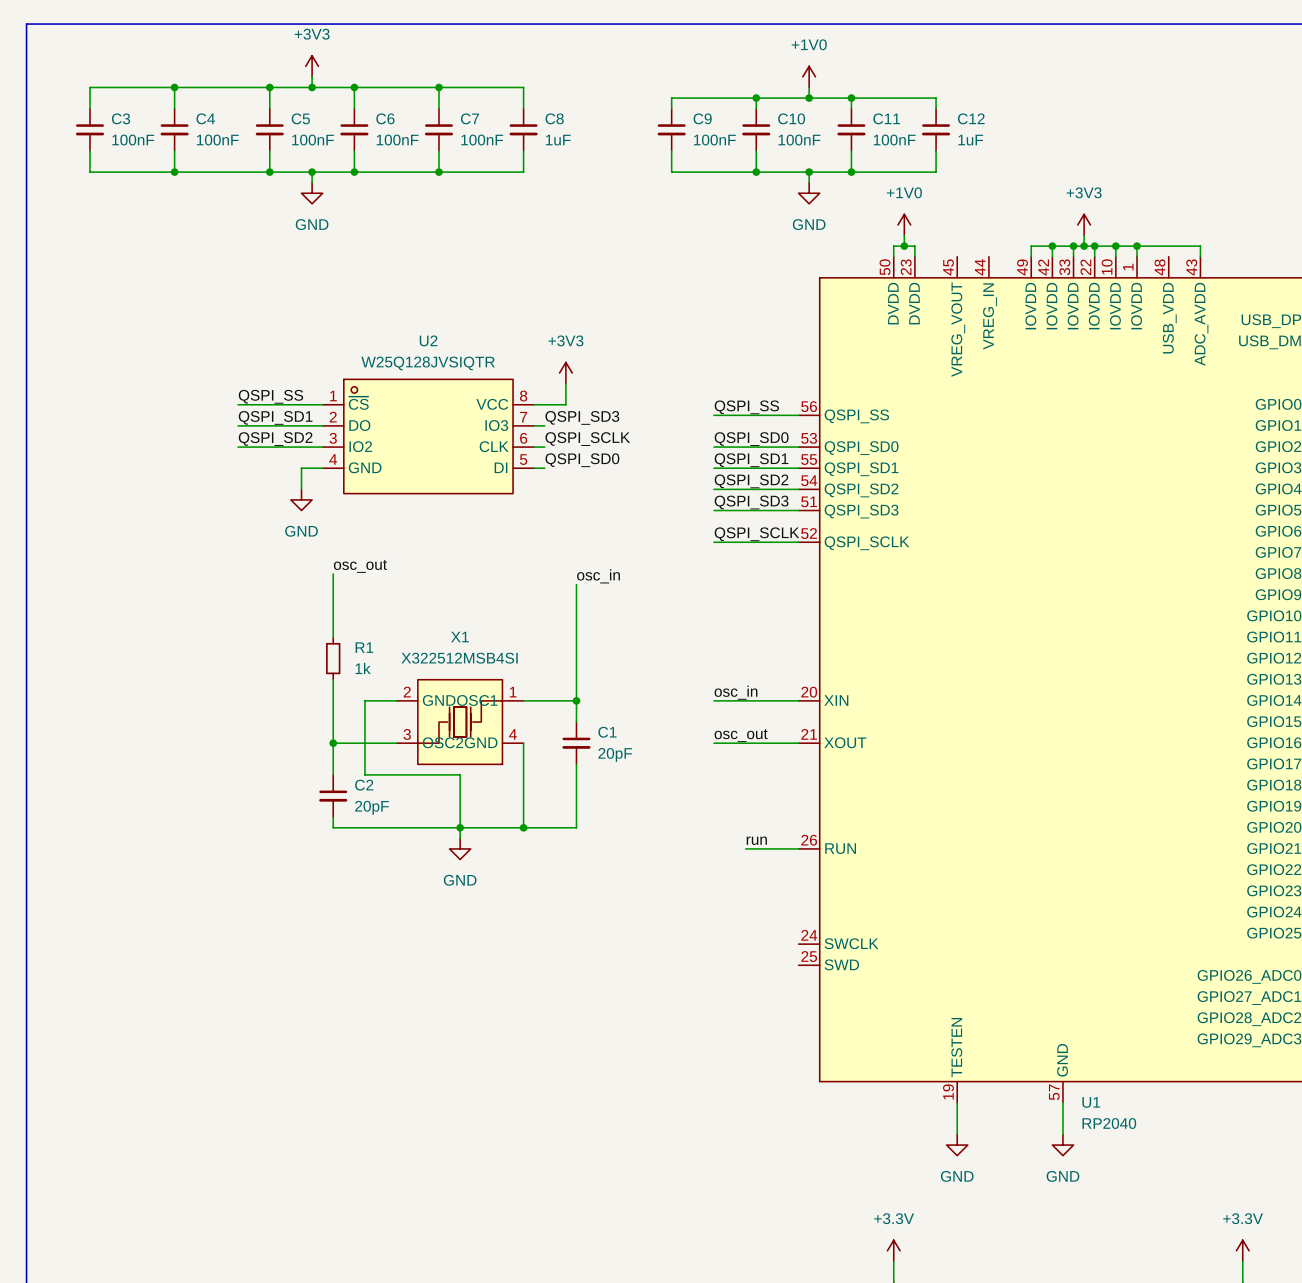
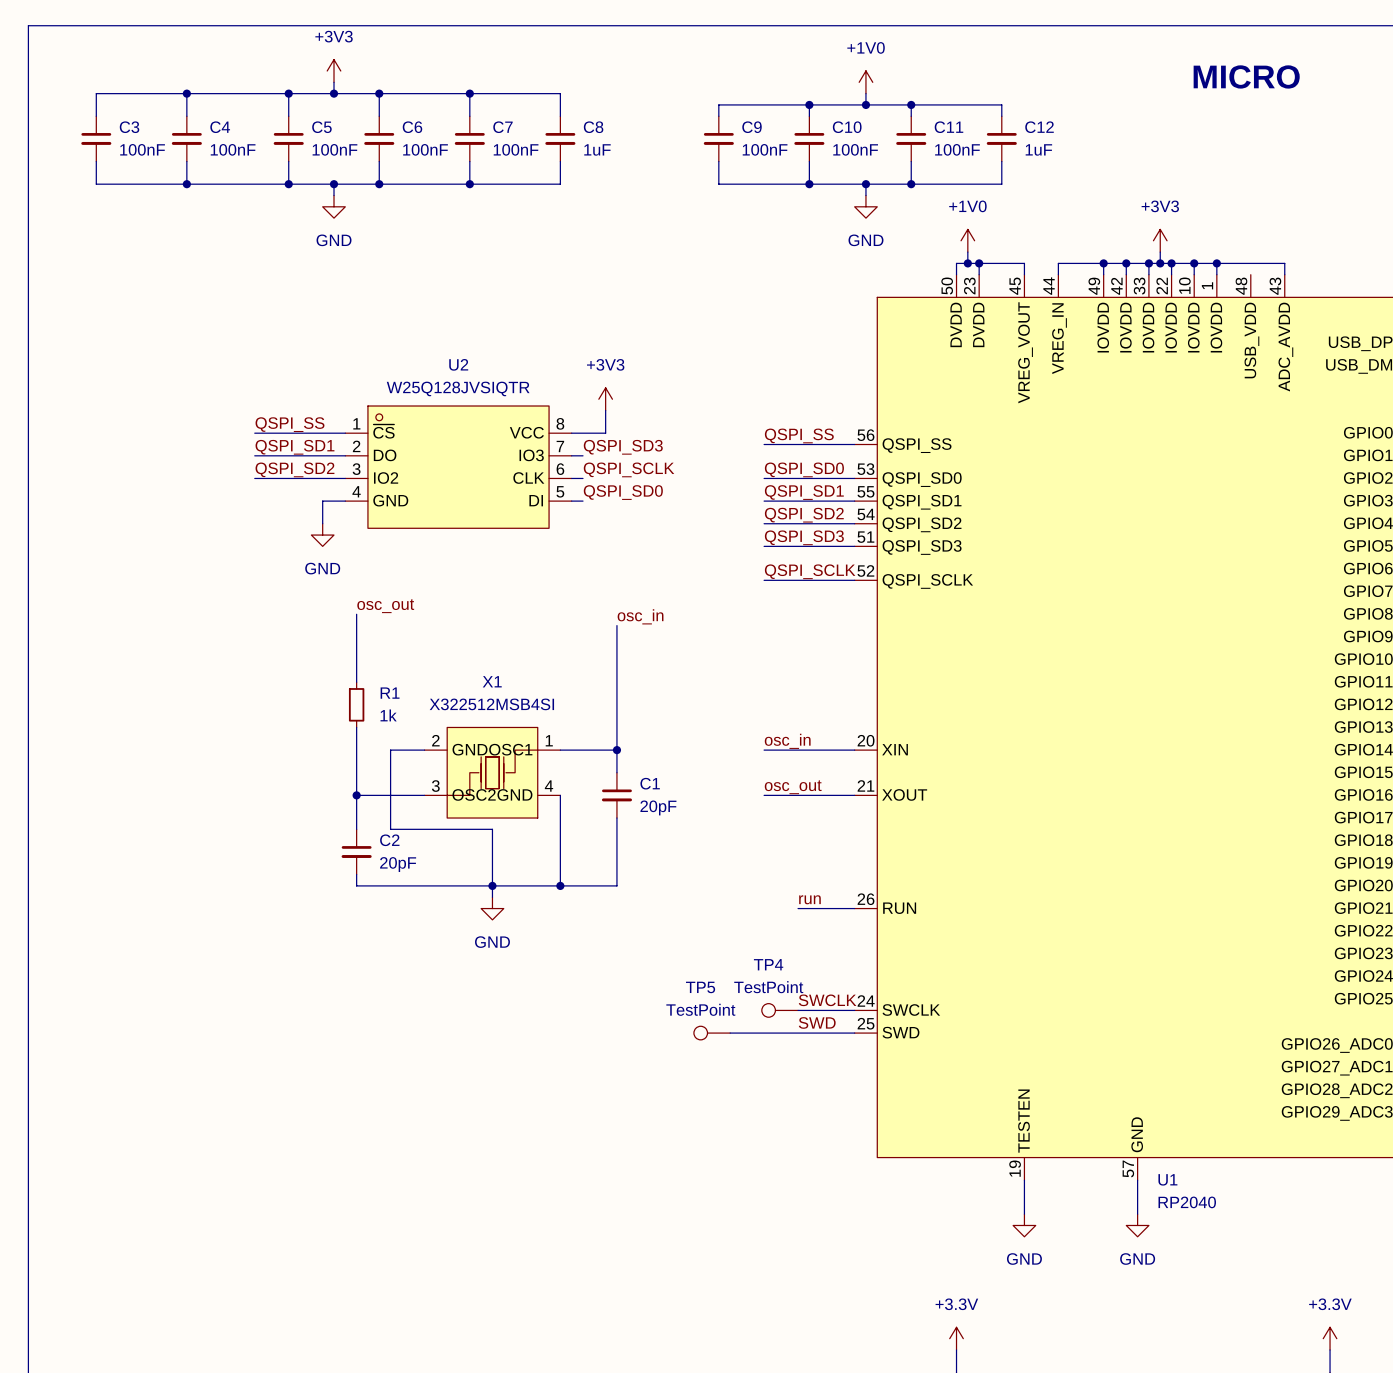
text: none -> MICRO (1246, 76)
wire: none -> (979, 263) (1024, 263) (1024, 274)
junction: none -> (979, 263)
wire: none -> (1103, 263) (1058, 263) (1058, 274)
junction: none -> (1103, 263)
label: none -> SWCLK (827, 1000)
TP4: none -> TestPoint (779, 1010)
wire: none -> (798, 1010) (854, 1010)
label: none -> SWD (817, 1022)
TP5: none -> TestPoint (712, 1033)
wire: none -> (730, 1033) (854, 1033)

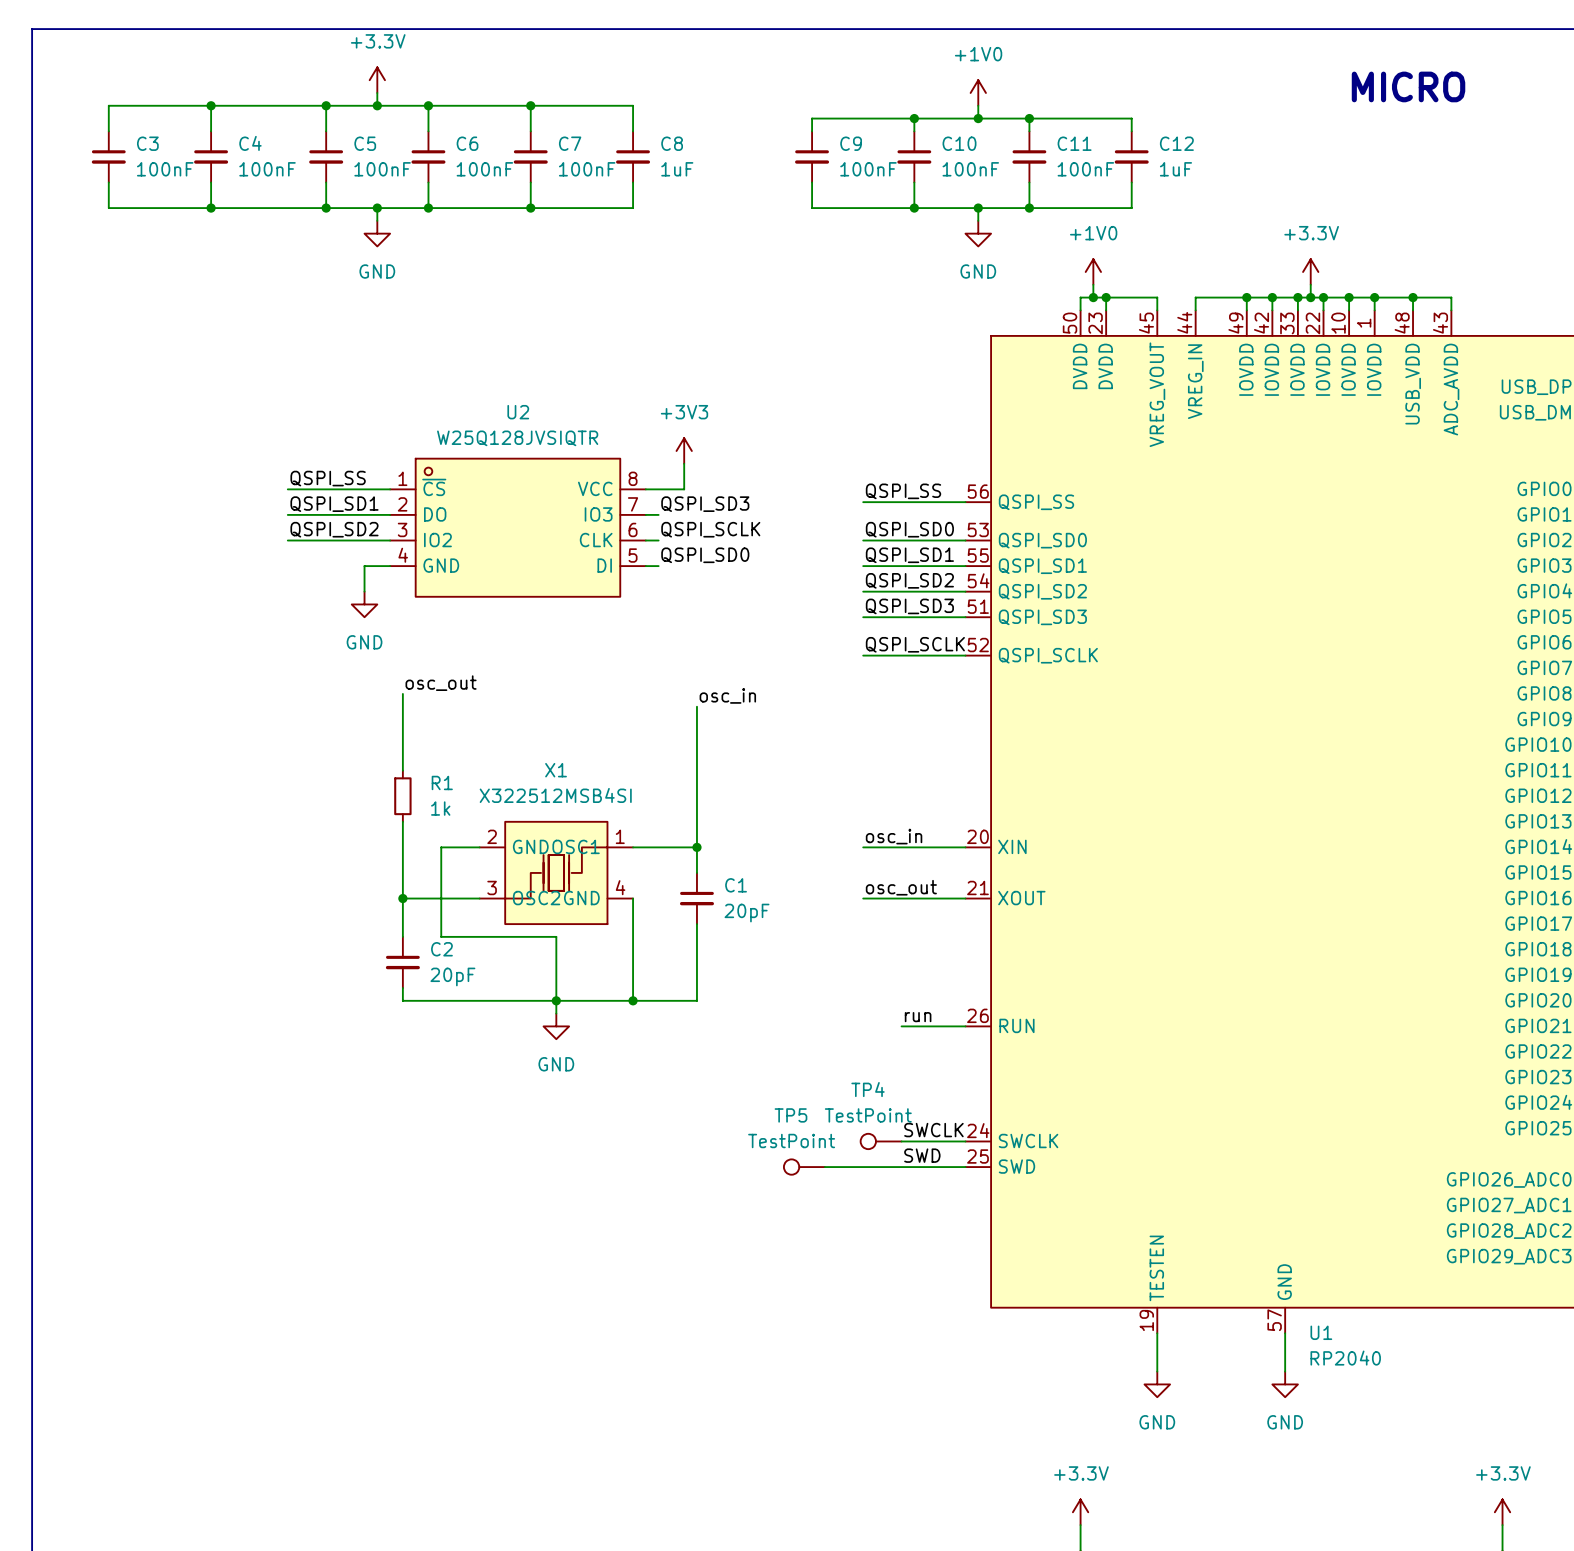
power symbol: +3V3 (334, 70) -> +3.3V (377, 80)
power symbol: +3V3 (1160, 240) -> +3.3V (1310, 272)
wire: none -> (1413, 297) (1413, 310)
junction: none -> (1413, 297)

